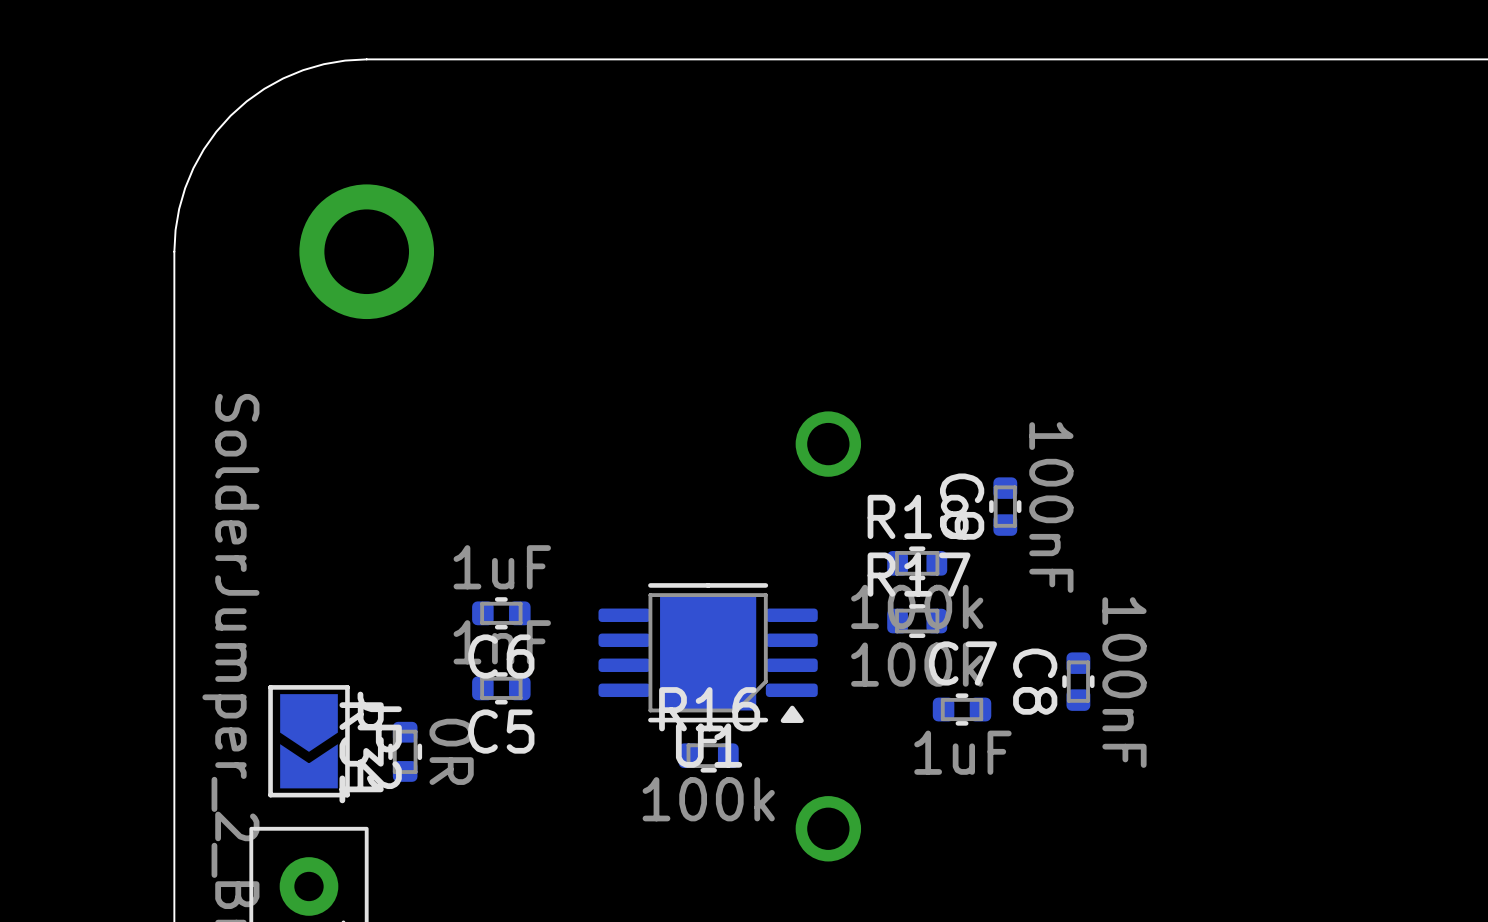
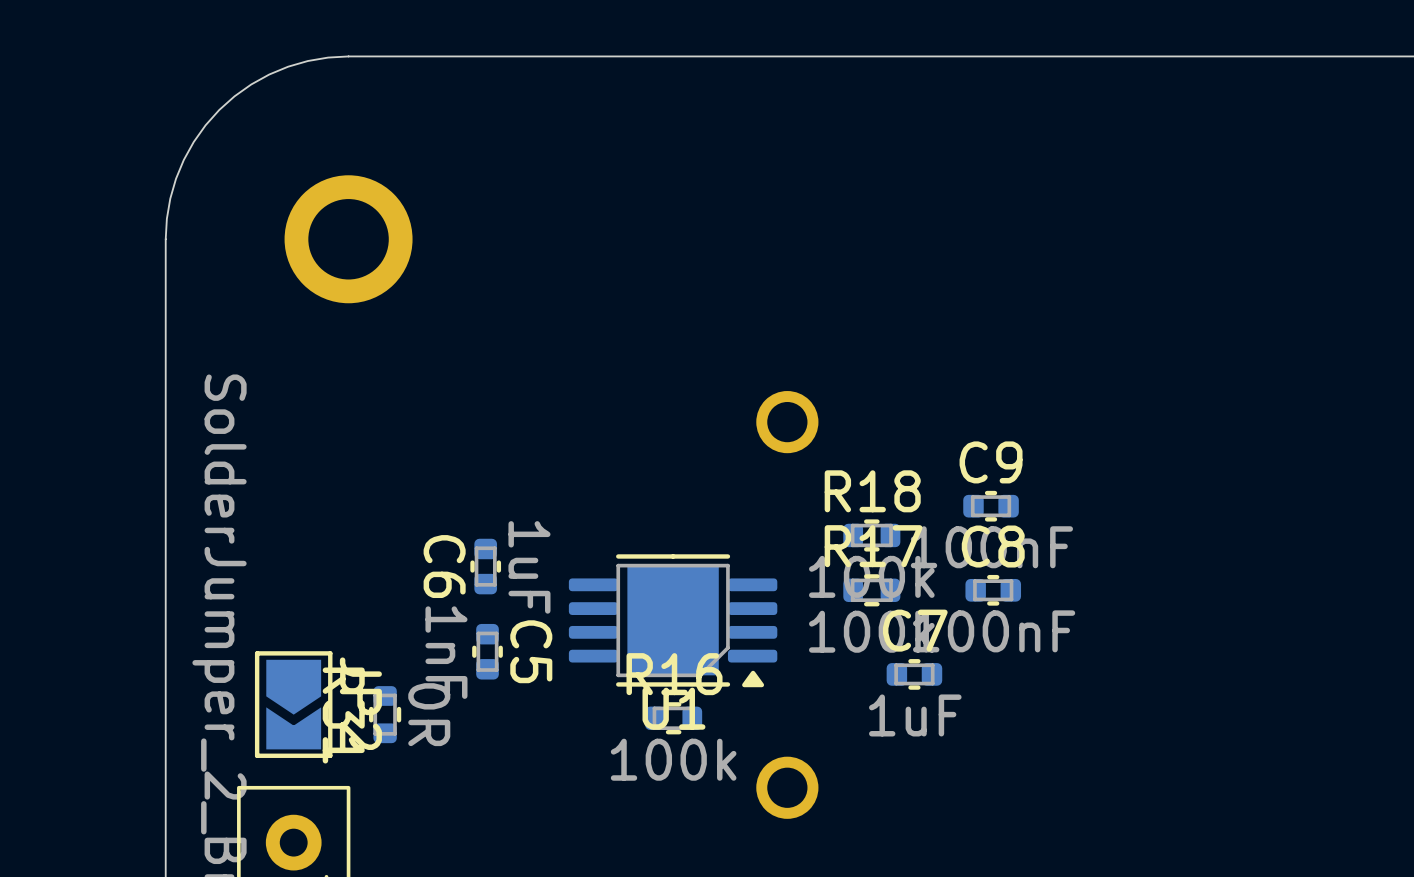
C9 rotation: 0° (1005, 506) -> 90° clockwise (991, 506)
C9 position: (1005, 506) -> (991, 506)
C6 rotation: 0° (501, 613) -> 90° clockwise (485, 566)
C8 rotation: 0° (1078, 681) -> 90° clockwise (993, 590)
C8 position: (1078, 681) -> (993, 590)
C5 rotation: 0° (501, 688) -> 90° clockwise (487, 651)

